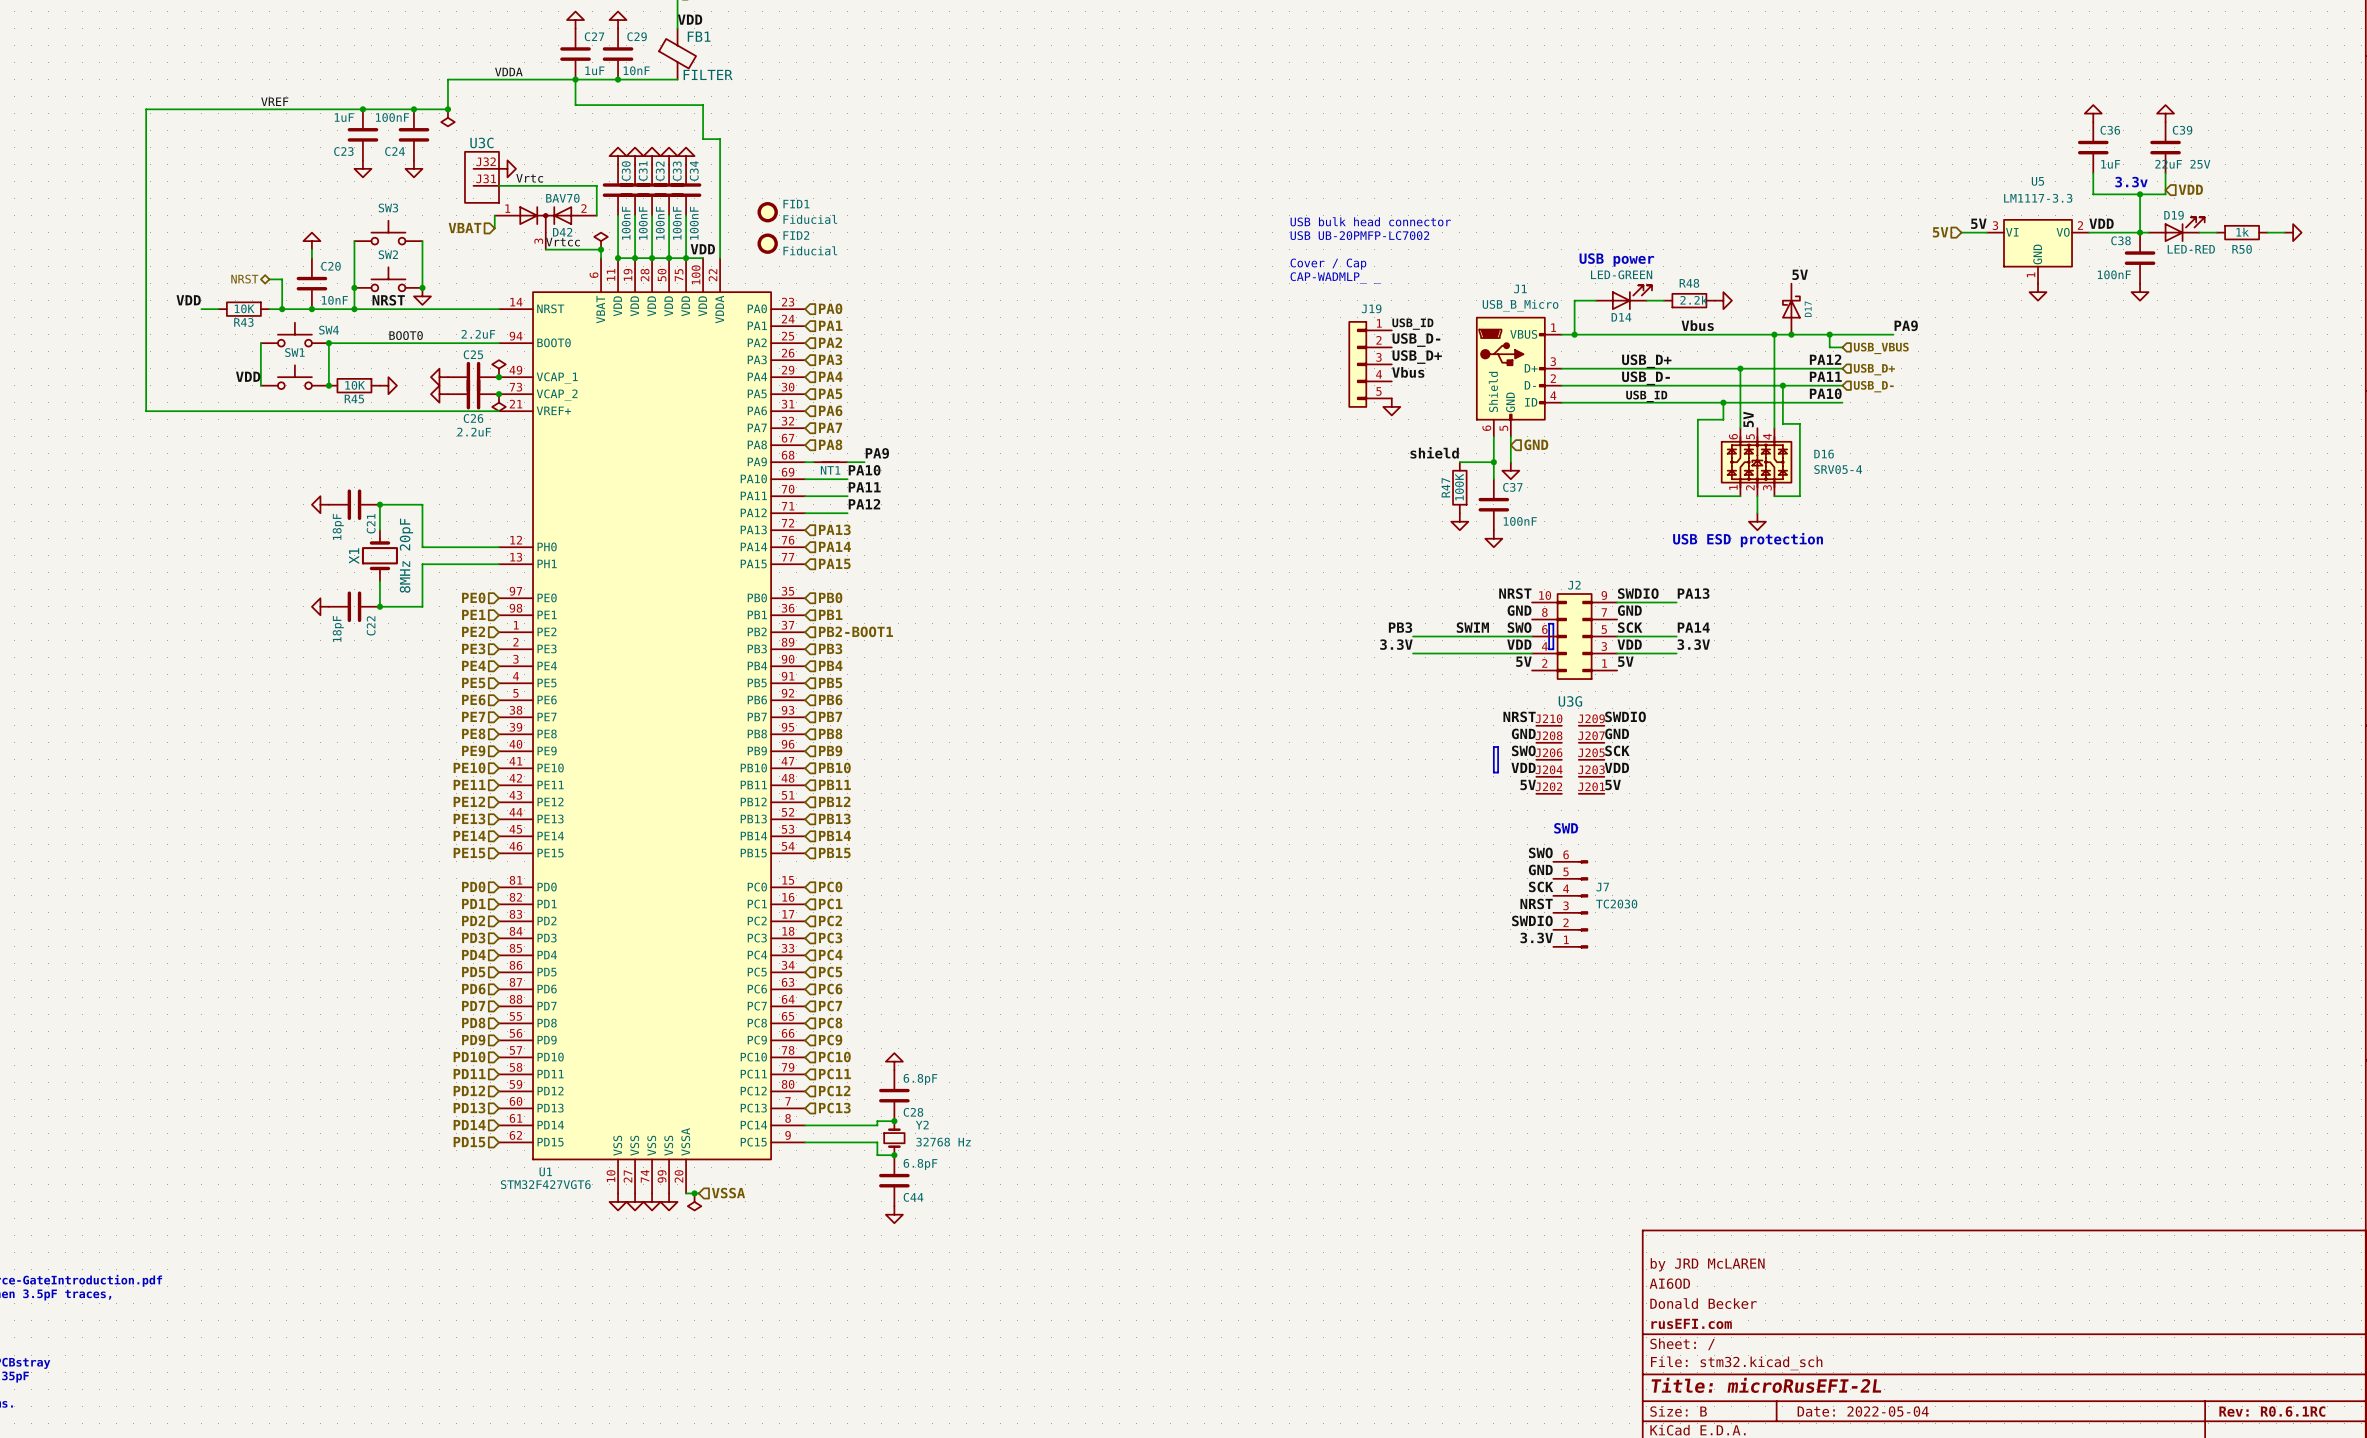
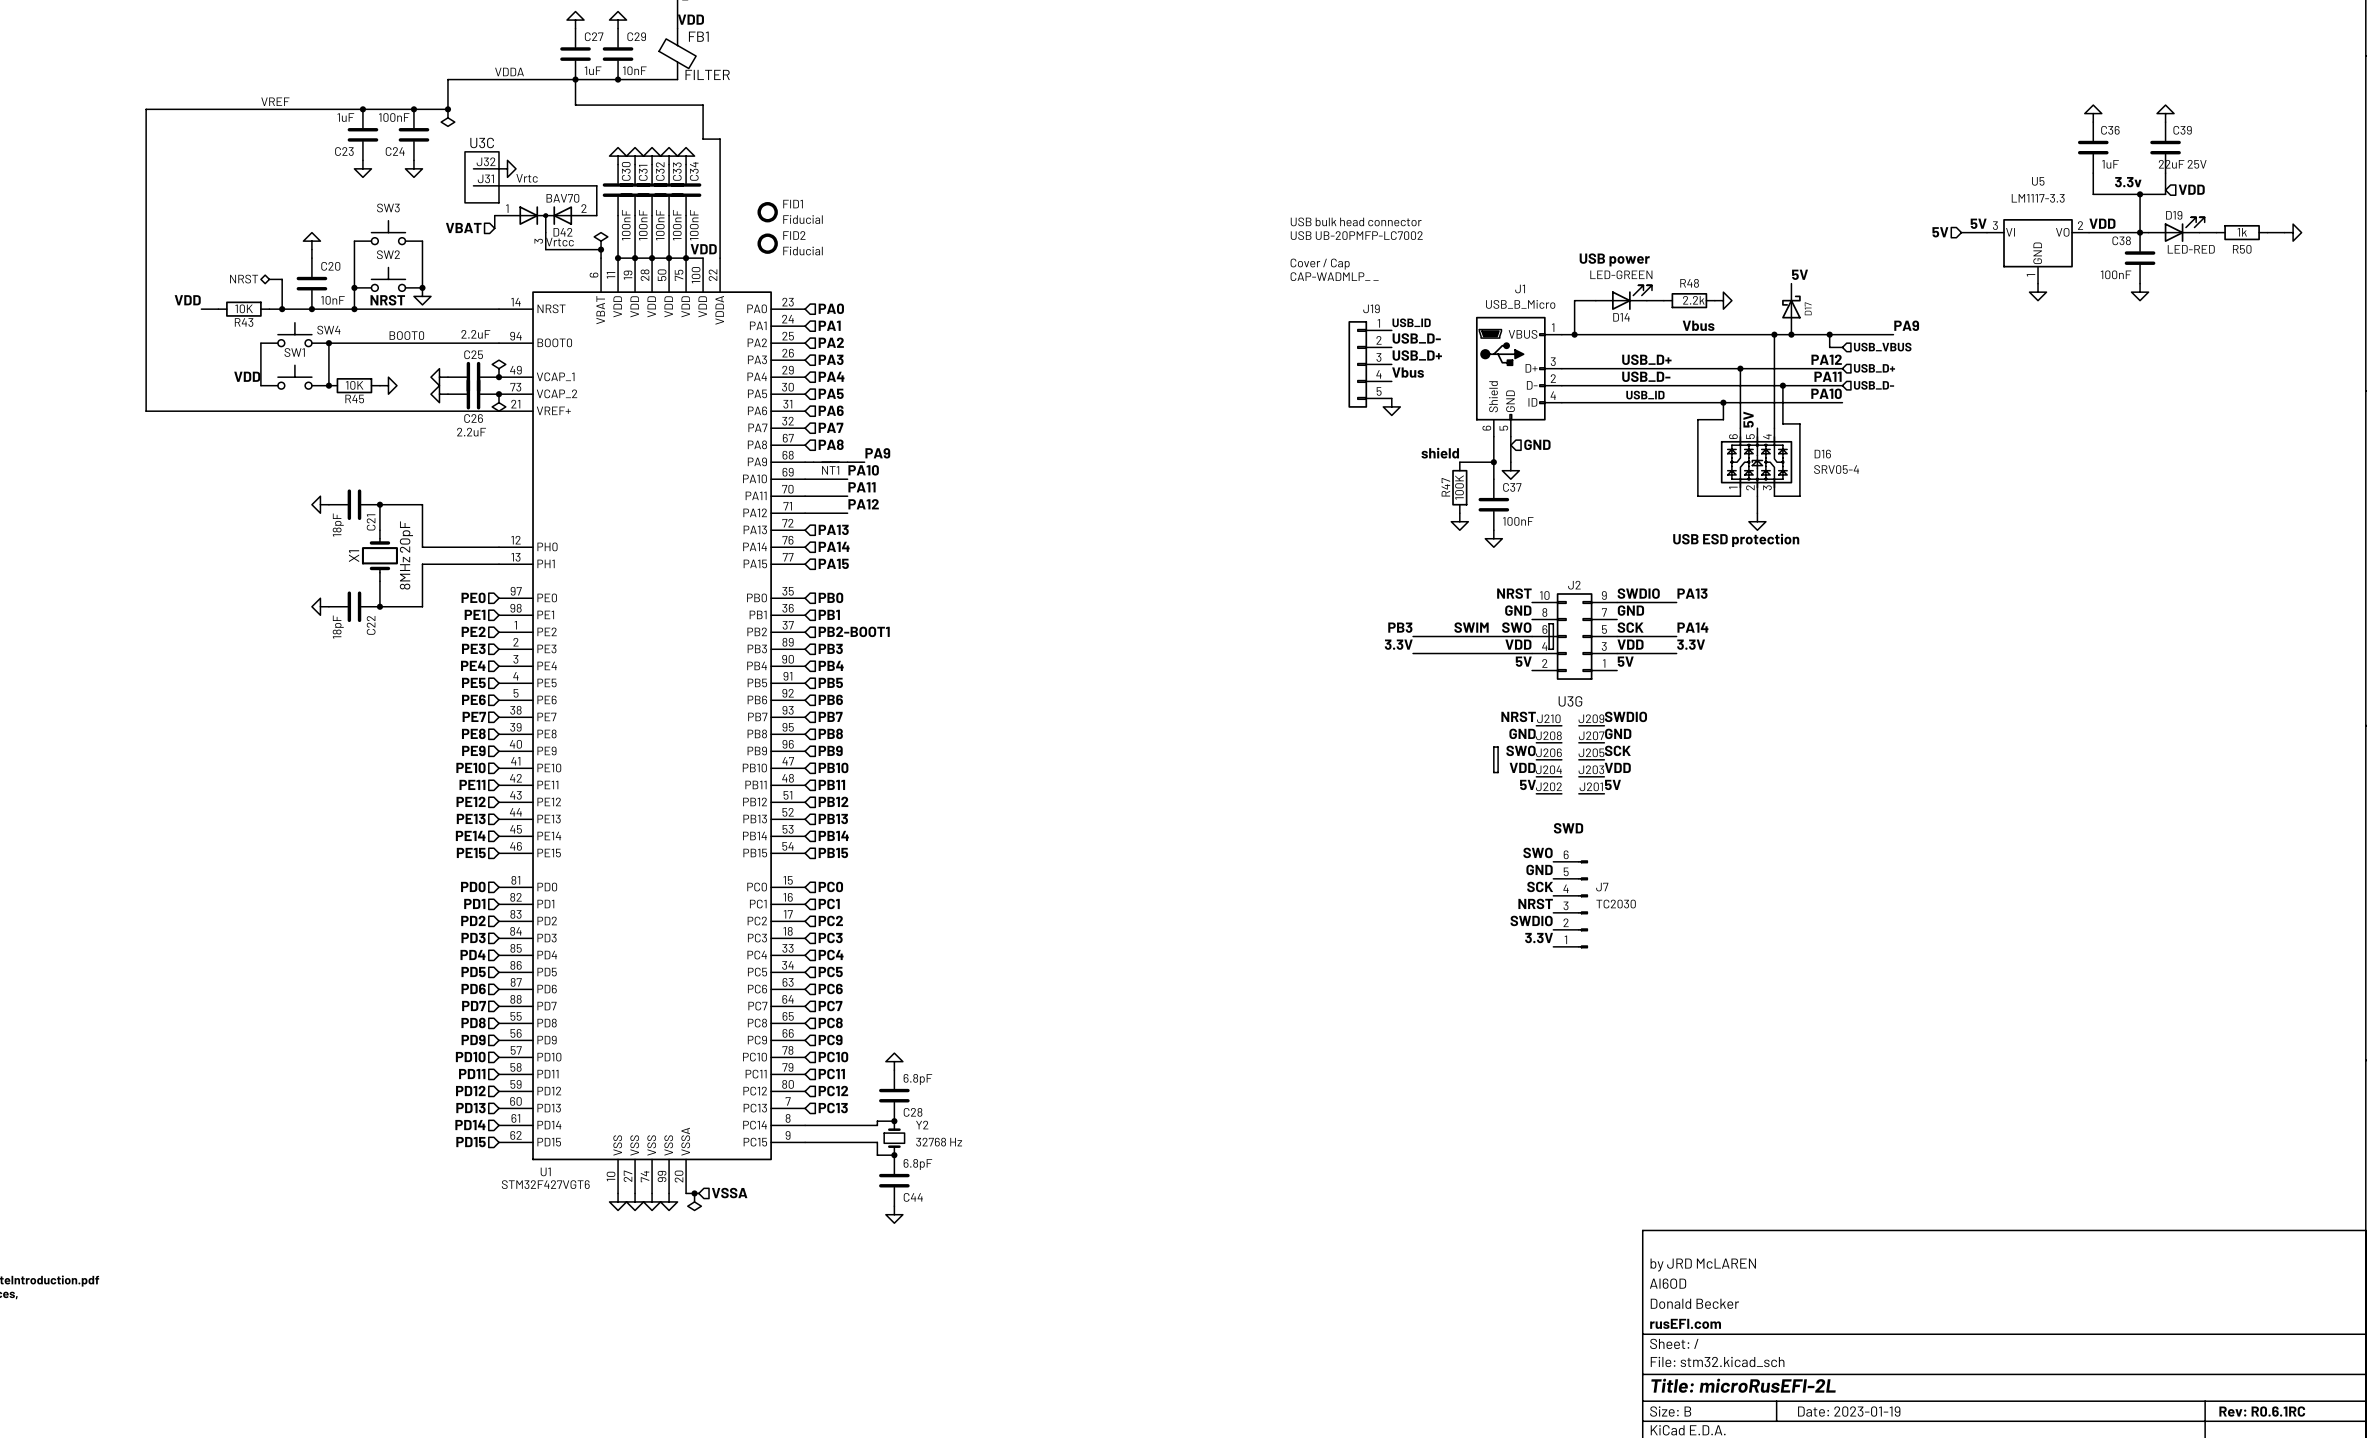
title block: Date: 2022-05-04 (1863, 1411) -> Date: 2023-01-19 (1849, 1411)

